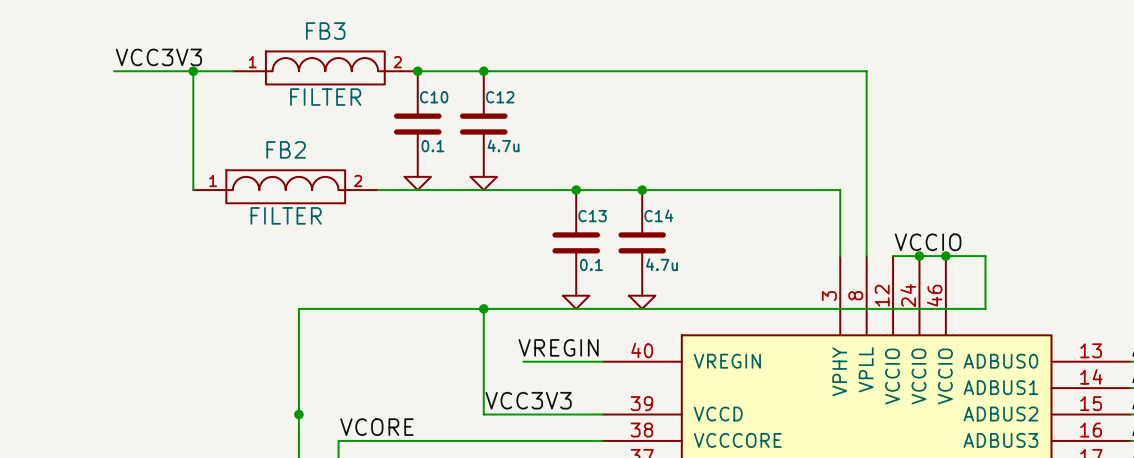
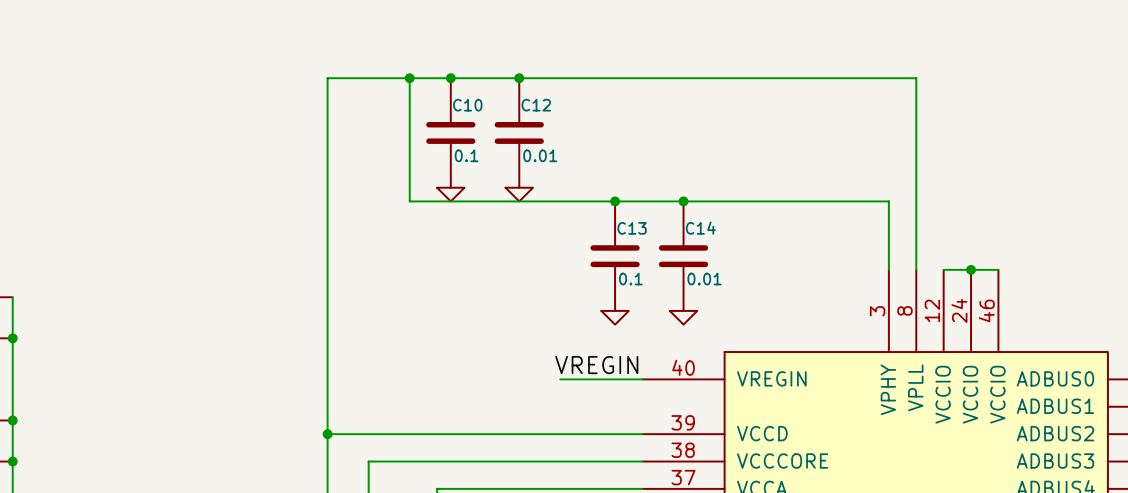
label: VCC3V3 (158, 57) -> none
FB3: FILTER (325, 67) -> none
wire: (114, 71) (232, 71) -> none
wire: (193, 71) (193, 190) -> (409, 78) (409, 201)
junction: (193, 71) -> none
junction: none -> (409, 78)
C12 value: 4.7u (503, 145) -> 0.01 (540, 155)
FB2: FILTER (285, 186) -> none
label: VCCIO (928, 242) -> none
wire: (945, 256) (985, 256) (985, 308) (298, 308) -> (450, 78) (327, 78) (327, 324)
junction: (945, 256) -> none
C14 value: 4.7u (661, 264) -> 0.01 (704, 279)
wire: (483, 308) (483, 414) -> (327, 434) (519, 434)
junction: (483, 308) -> none
label: VCC3V3 (528, 400) -> none
label: VCORE (376, 427) -> none

